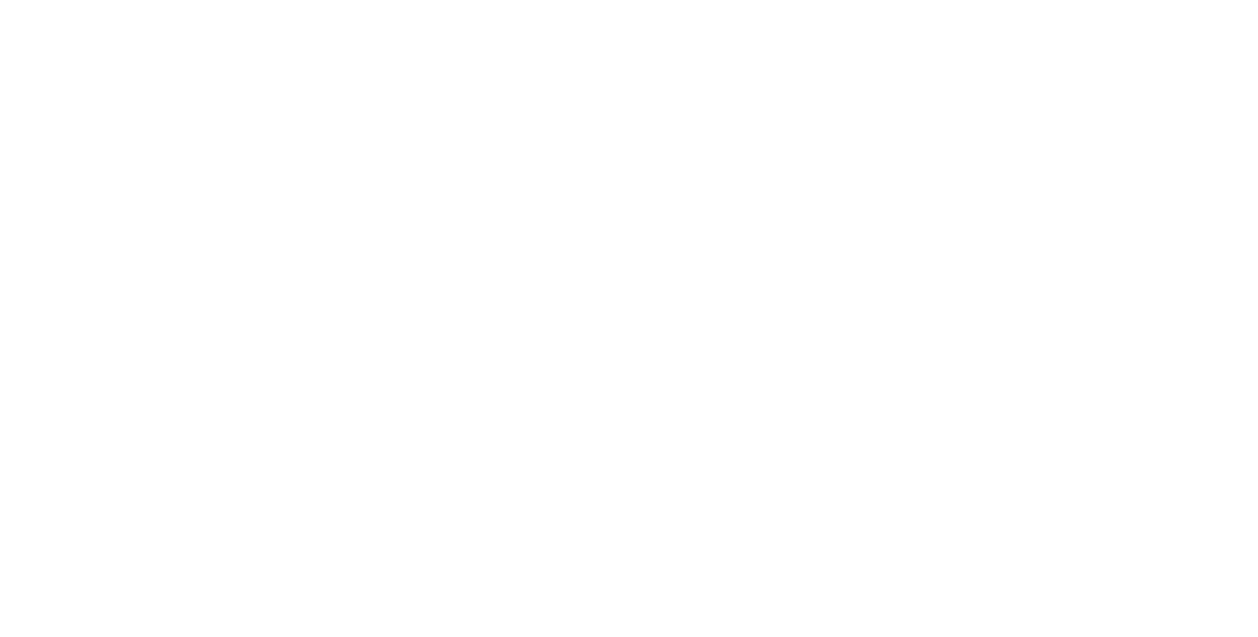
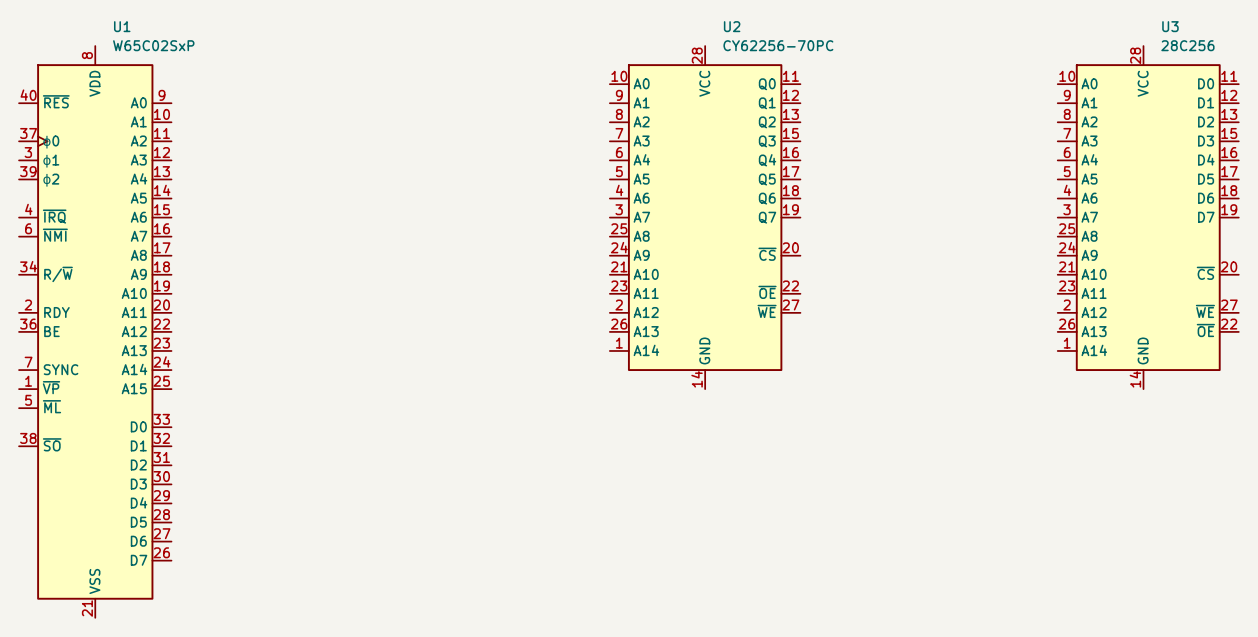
U2: none -> CY62256-70PC (705, 217)
U3: none -> 28C256 (1148, 217)
U1: none -> W65C02SxP (95, 331)

